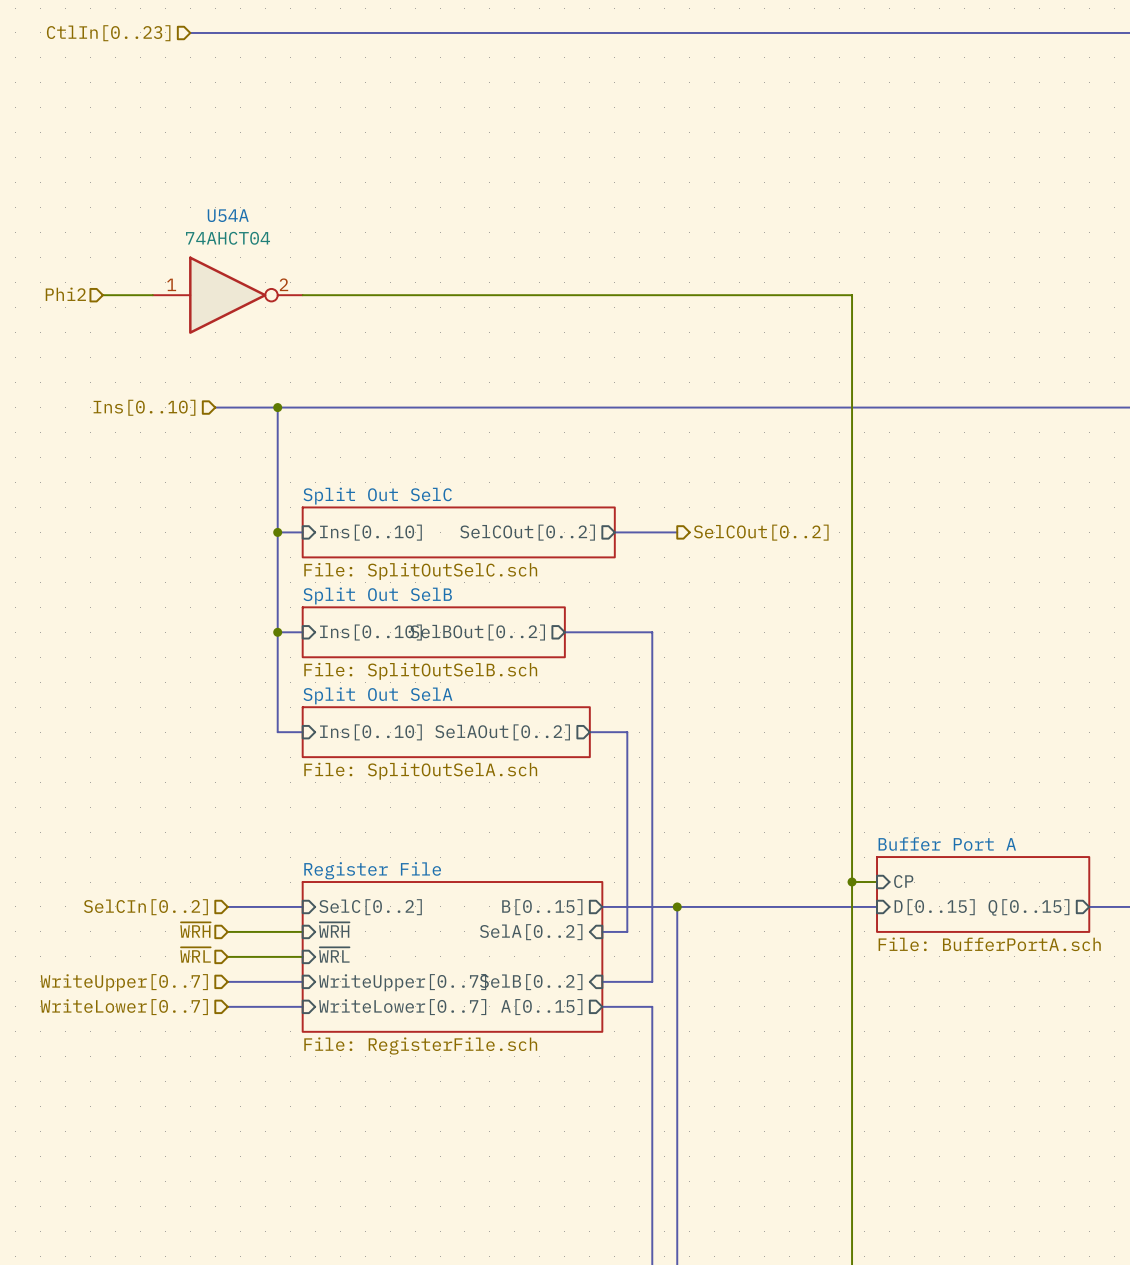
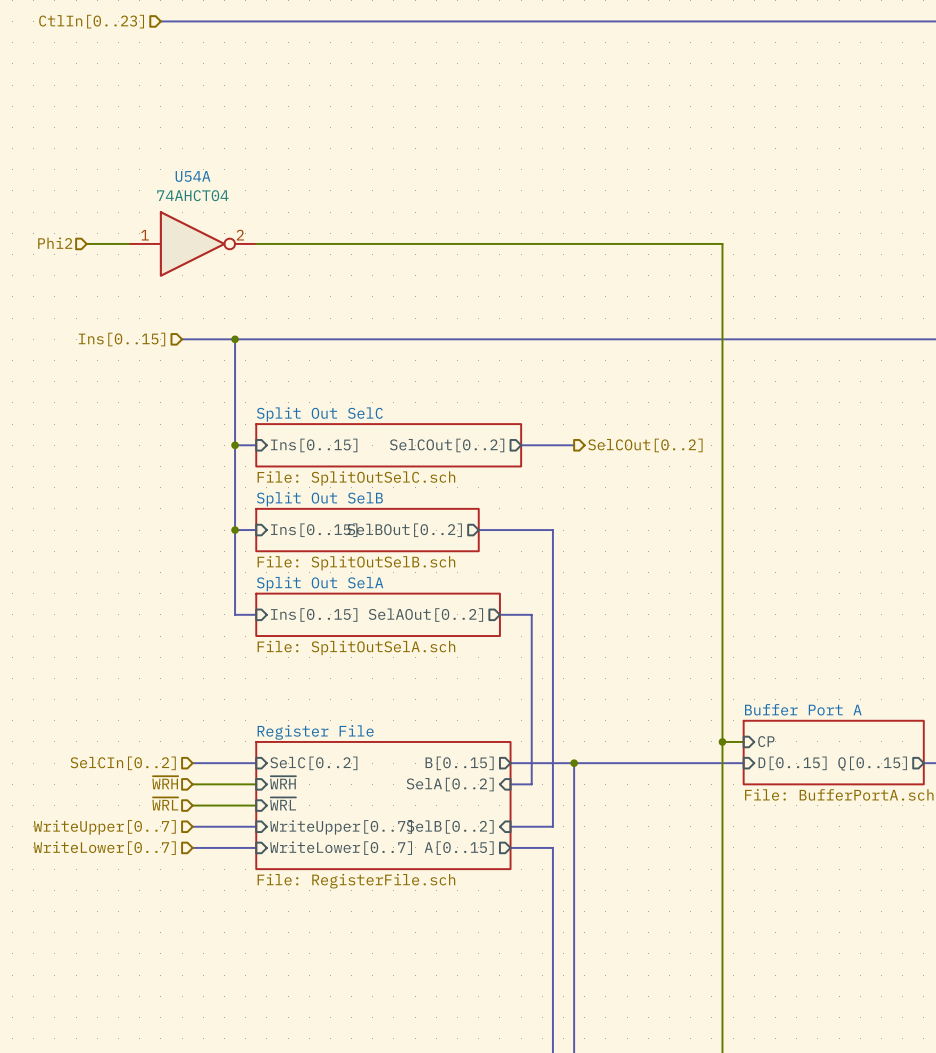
hierarchical label: Ins[0..10] (144, 407) -> Ins[0..15] (122, 339)
sheet pin: Ins[0..10] (370, 532) -> Ins[0..15] (314, 445)
sheet pin: Ins[0..10] (370, 632) -> Ins[0..15] (314, 530)
sheet pin: Ins[0..10] (370, 732) -> Ins[0..15] (314, 615)

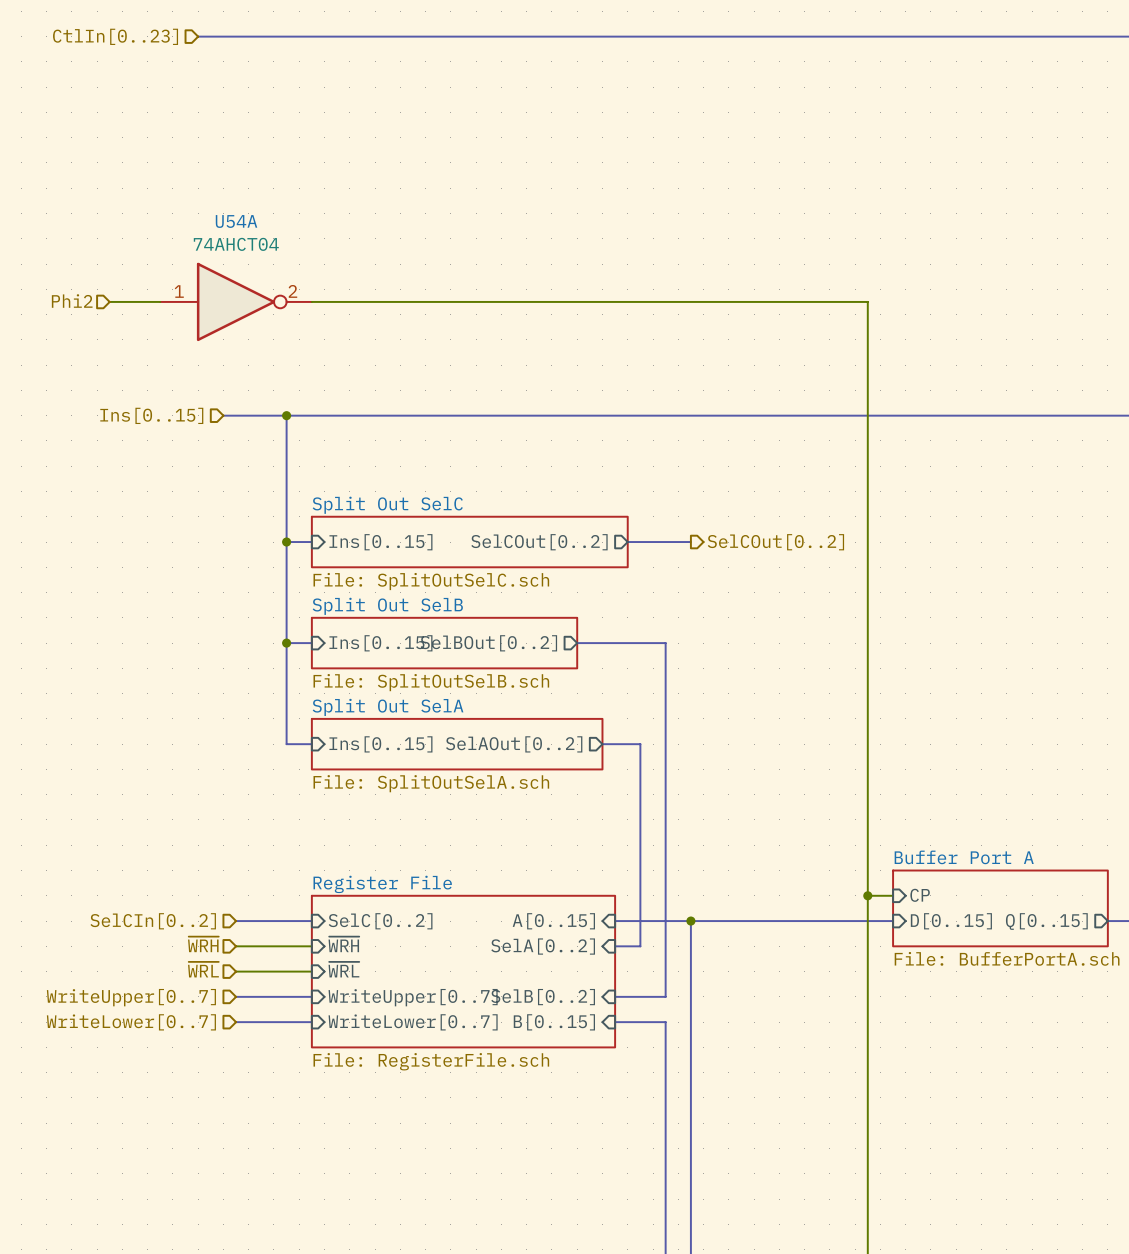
sheet pin shape: output (459, 763) -> input (553, 921)
sheet pin: B[0..15] (459, 763) -> A[0..15] (553, 921)
sheet pin shape: output (459, 848) -> input (554, 1022)
sheet pin: A[0..15] (459, 848) -> B[0..15] (554, 1022)

